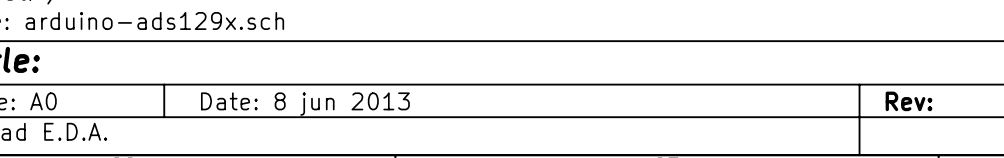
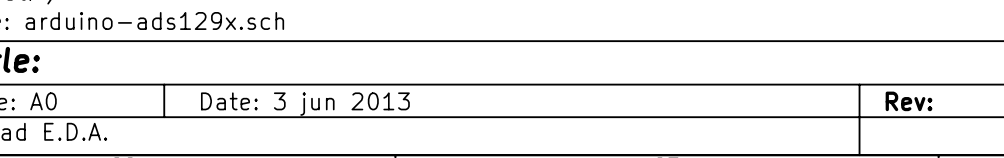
title block: Date: 8 jun 2013 (305, 104) -> Date: 3 jun 2013 (305, 104)

